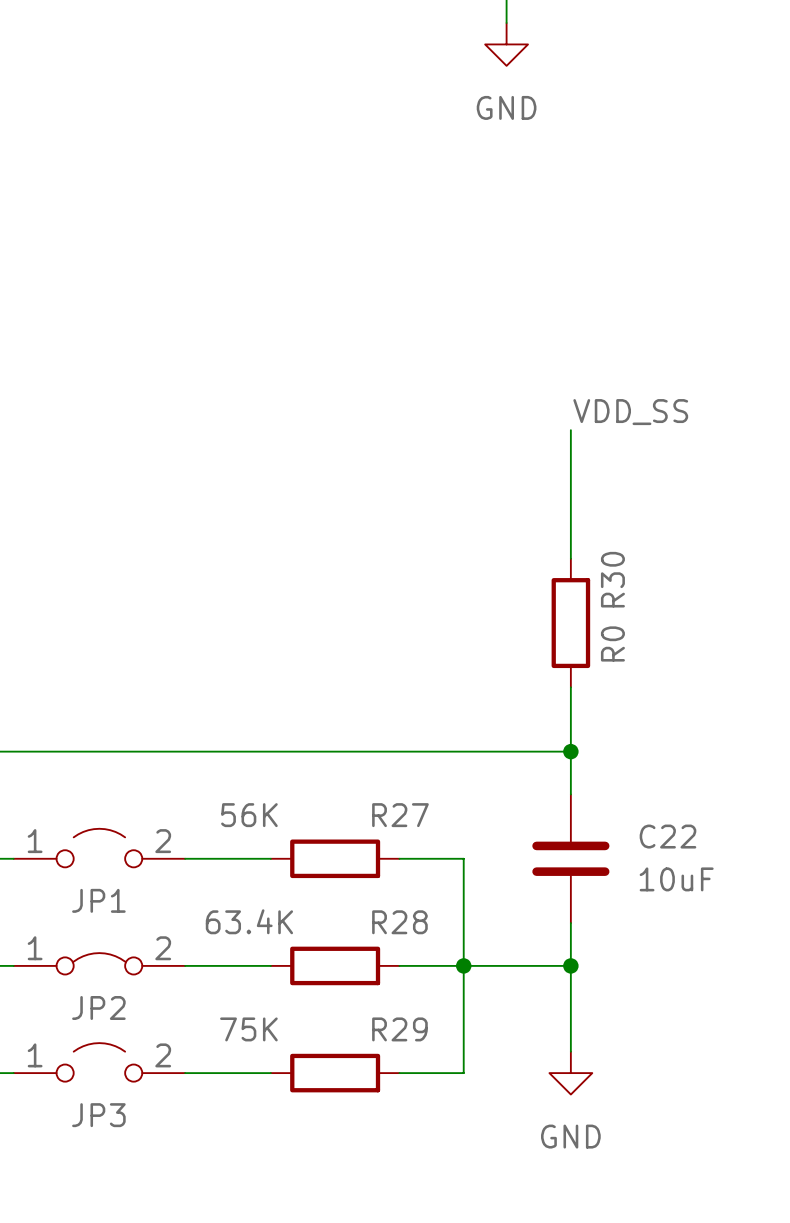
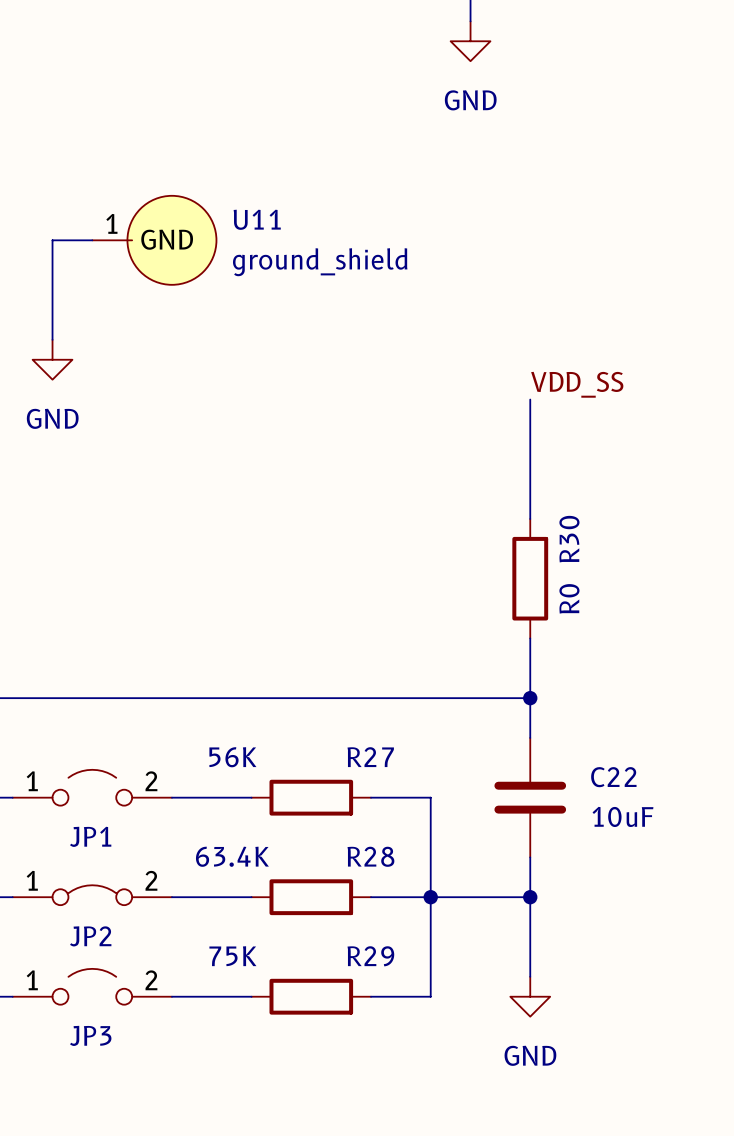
wire: none -> (92, 240) (52, 240) (52, 339)
U11: none -> ground_shield (154, 240)
power symbol: none -> GND (52, 359)

